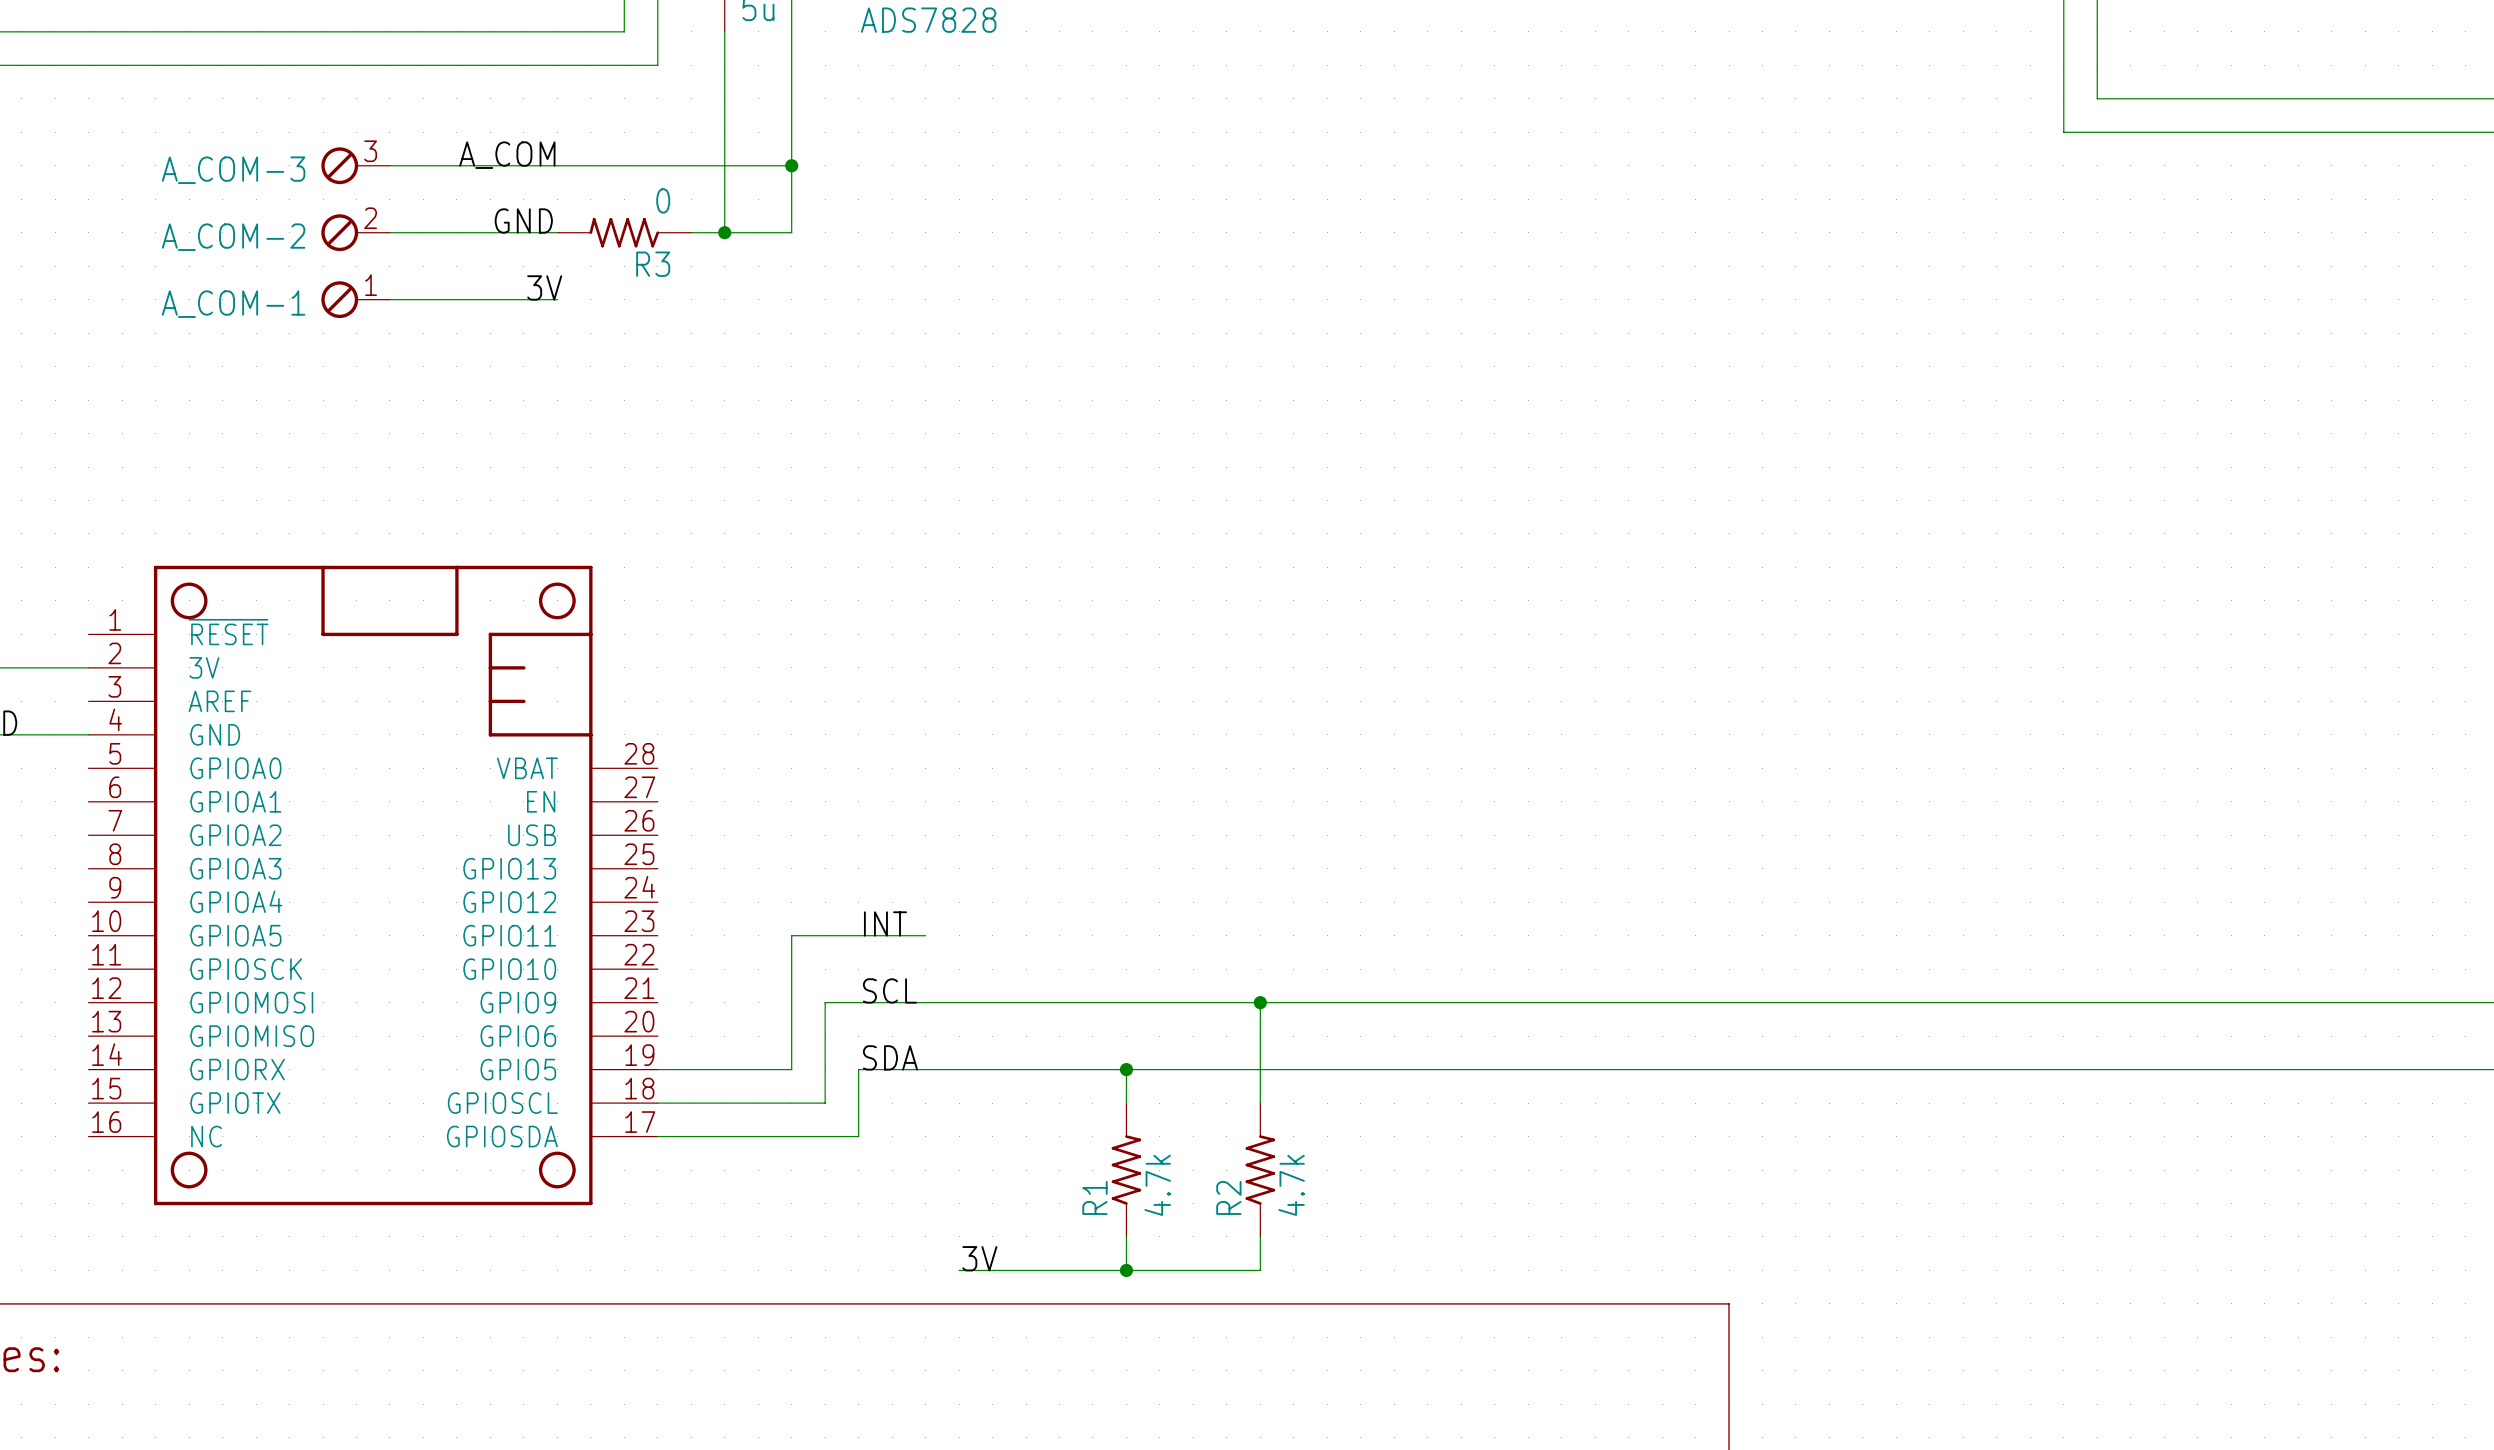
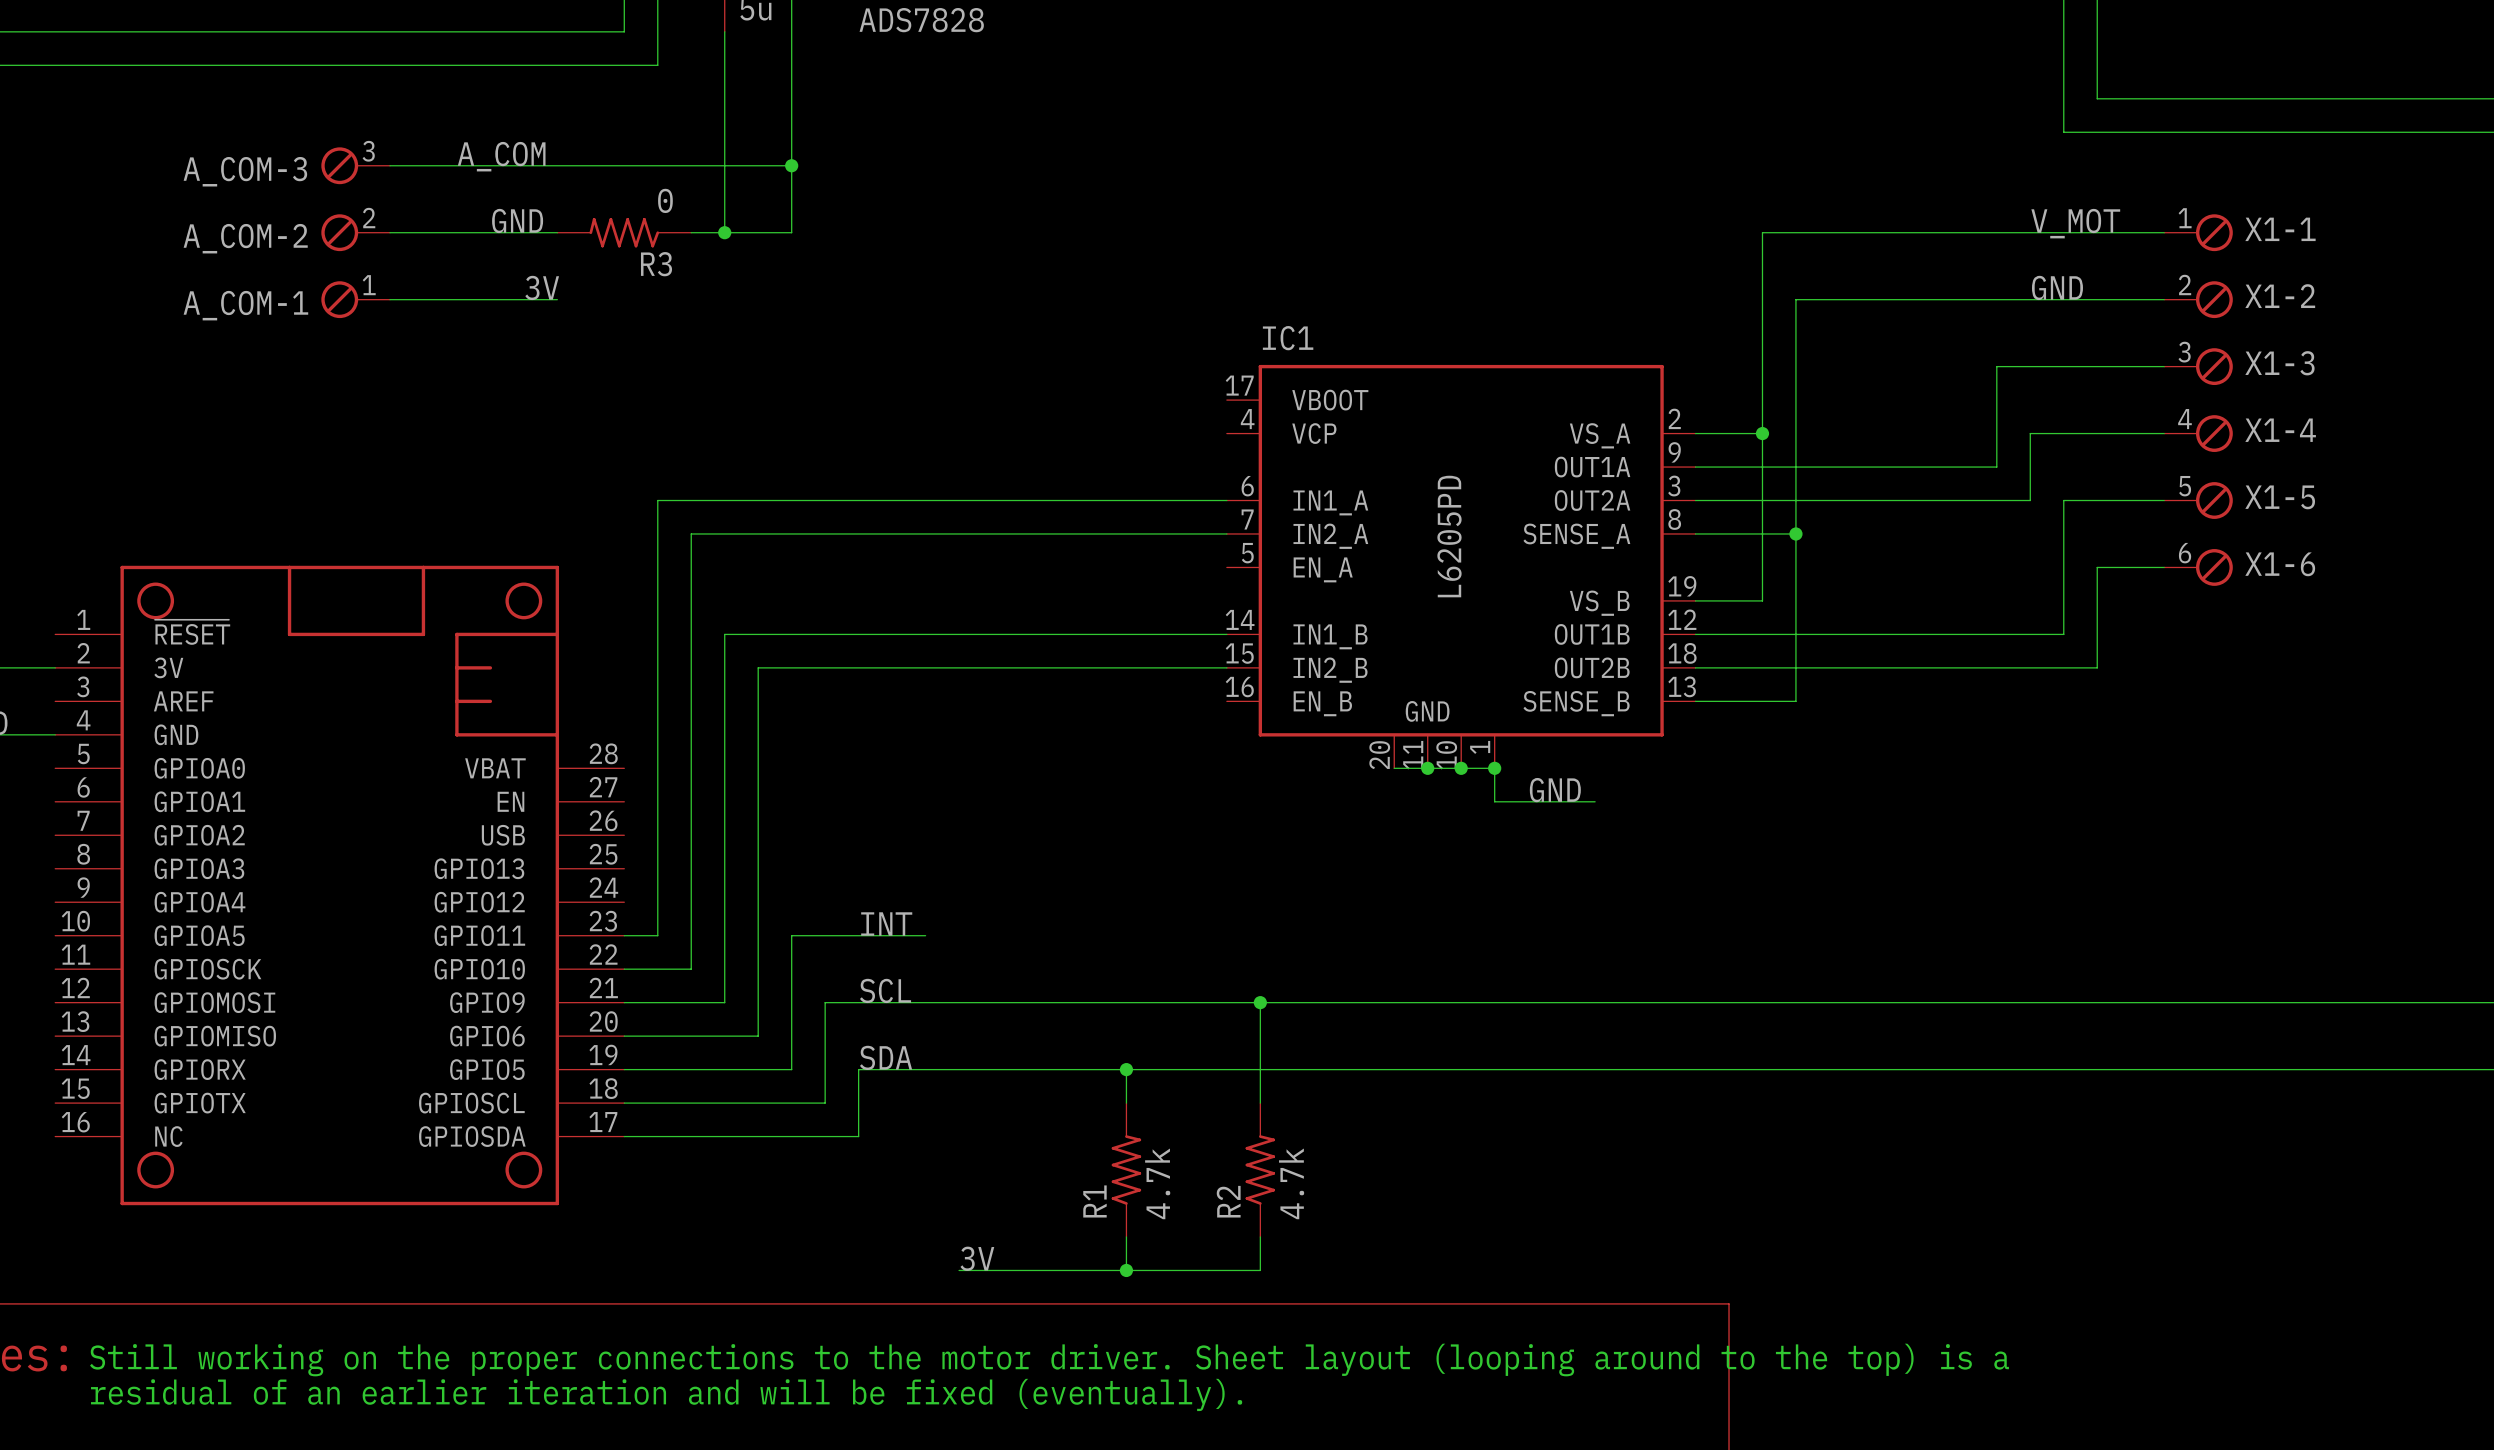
label: none -> V_MOT (2075, 223)
wire: none -> (2164, 232) (1762, 232) (1762, 600) (1695, 600)
X1-1: none -> (2198, 232)
label: none -> GND (2057, 287)
wire: none -> (2164, 299) (1795, 299) (1795, 701) (1695, 701)
X1-2: none -> (2198, 299)
wire: none -> (2164, 366) (1996, 366) (1996, 467) (1695, 467)
X1-3: none -> (2198, 366)
wire: none -> (1695, 433) (1762, 433)
junction: none -> (1762, 433)
wire: none -> (2164, 433) (2030, 433) (2030, 500) (1695, 500)
X1-4: none -> (2198, 433)
wire: none -> (1226, 500) (657, 500) (657, 935) (624, 935)
wire: none -> (2164, 500) (2063, 500) (2063, 634) (1695, 634)
X1-5: none -> (2198, 500)
wire: none -> (1226, 533) (691, 533) (691, 969) (624, 969)
wire: none -> (1695, 533) (1795, 533)
junction: none -> (1795, 533)
IC1: none -> L6205PD (1461, 566)
wire: none -> (2164, 567) (2097, 567) (2097, 667) (1695, 667)
X1-6: none -> (2198, 567)
wire: none -> (1226, 634) (724, 634) (724, 1002) (624, 1002)
wire: none -> (1226, 667) (758, 667) (758, 1036) (624, 1036)
wire: none -> (1394, 768) (1494, 768) (1494, 801) (1595, 801)
junction: none -> (1427, 768)
junction: none -> (1461, 768)
junction: none -> (1494, 768)
label: none -> GND (1555, 790)
part position: (373, 885) -> (339, 885)
text: none -> Still working on the proper connections to the motor driver. Sheet layout (looping around to the top) is a (1049, 1360)
text: none -> residual of an earlier iteration and will be fixed (eventually). (666, 1394)

